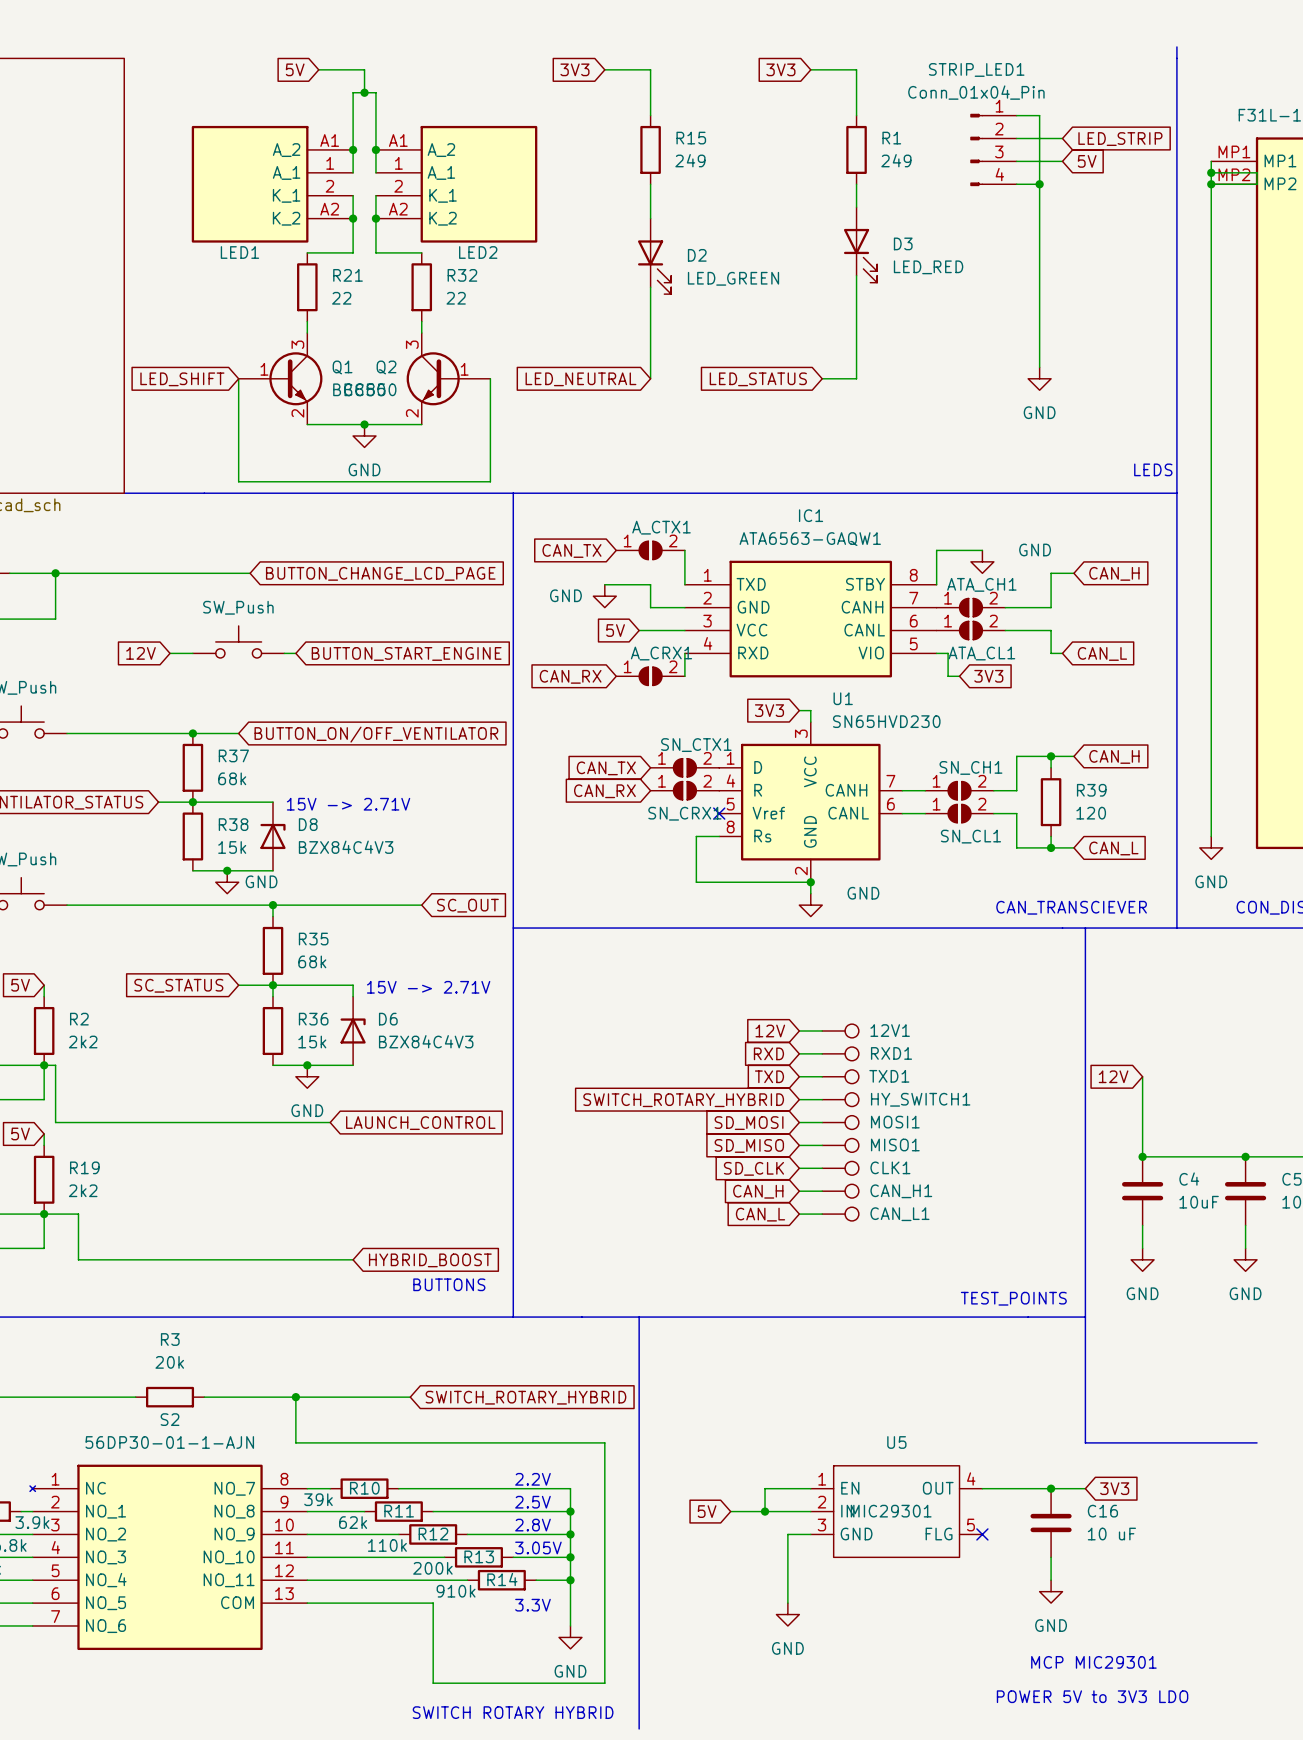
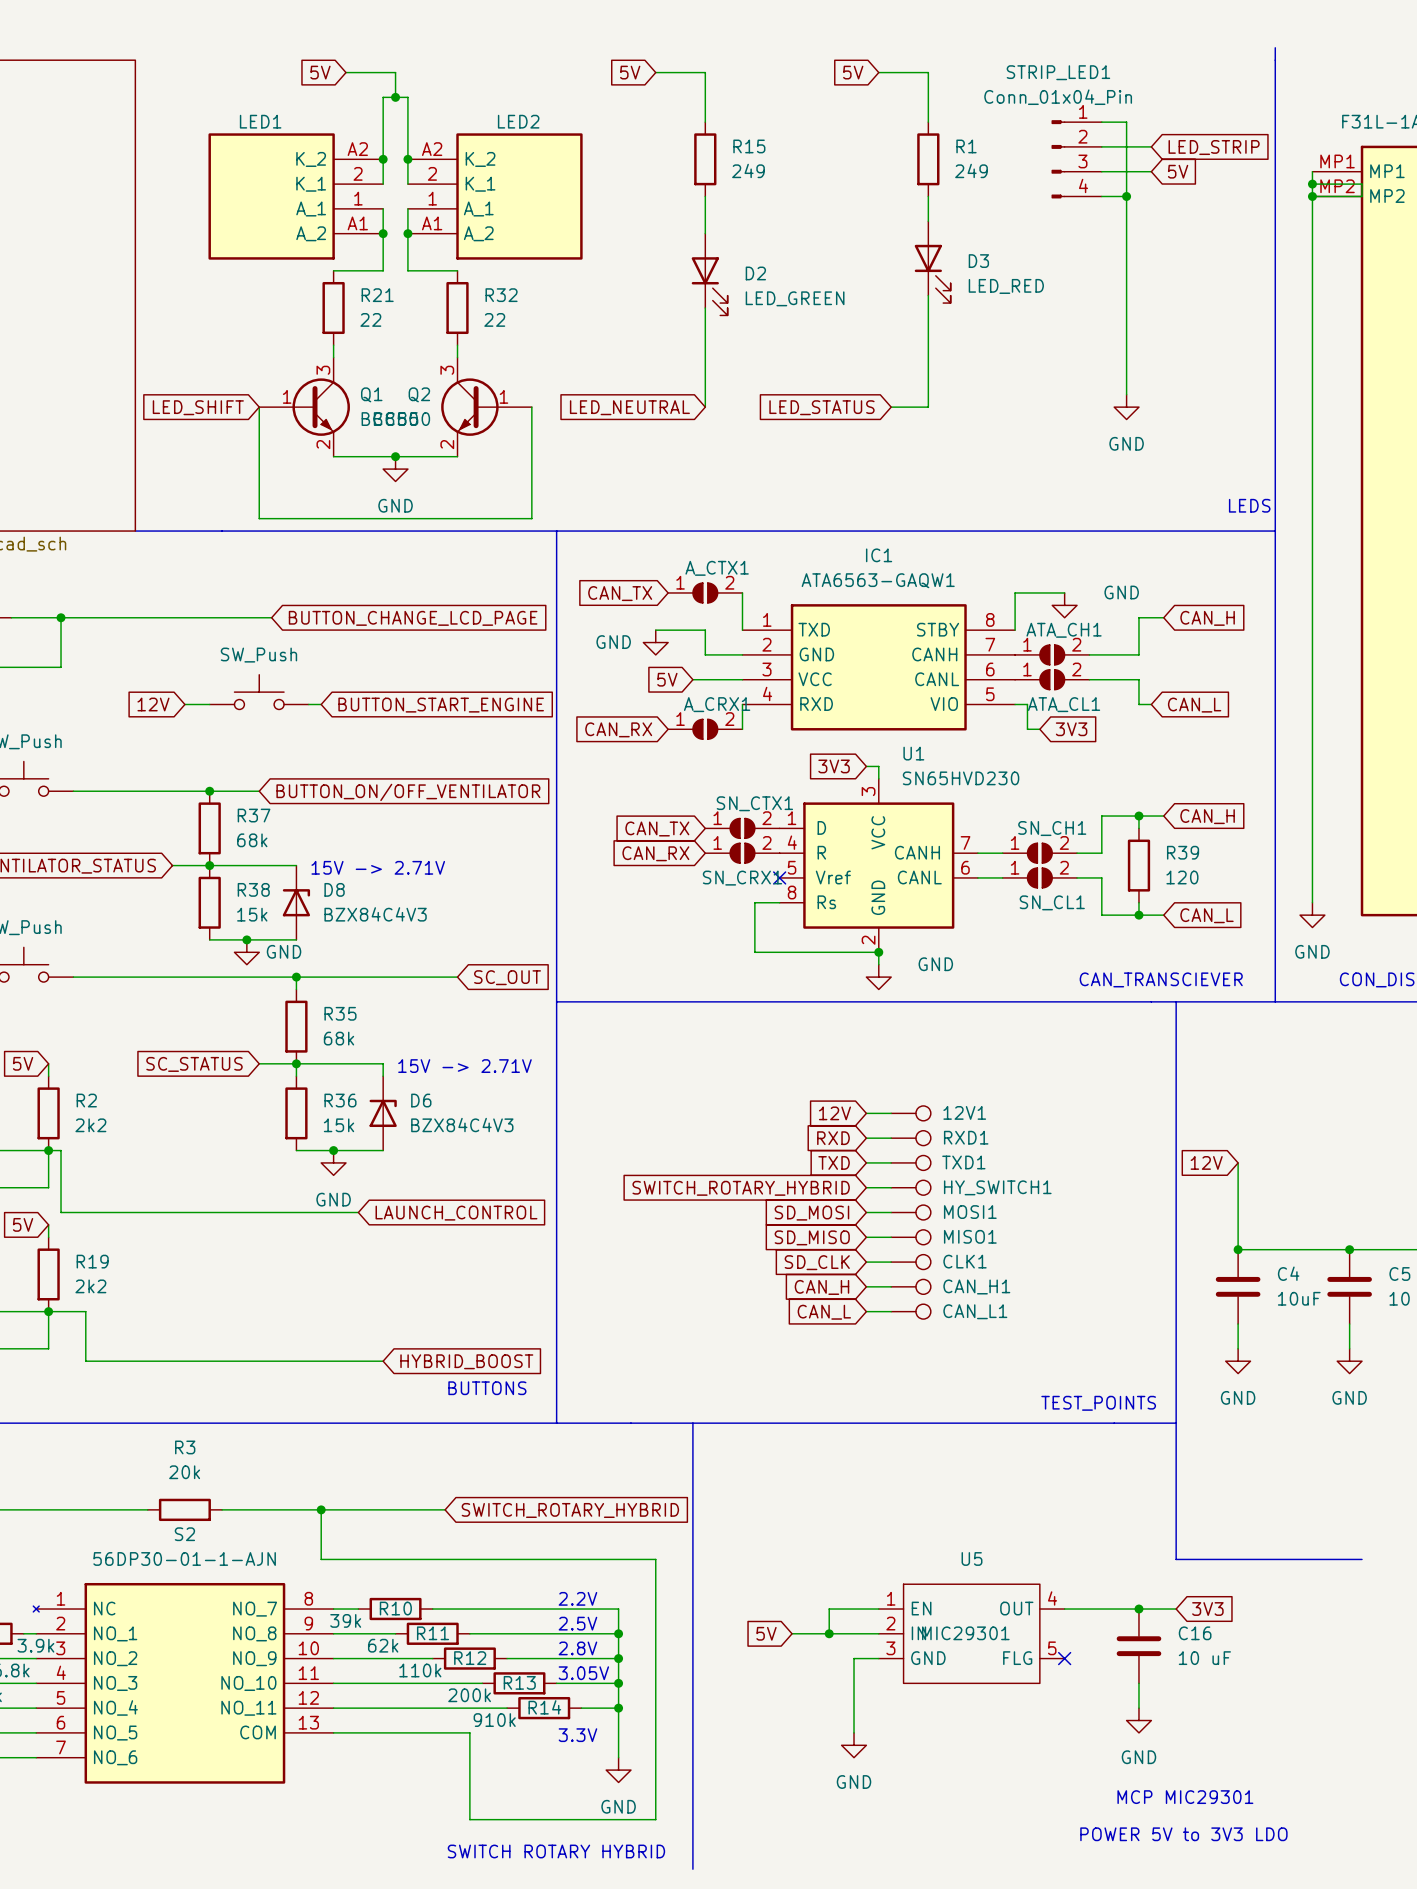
global label: 3V3 (574, 69) -> 5V (630, 72)
global label: 3V3 (780, 69) -> 5V (853, 72)
LED1 flip: as is (250, 184) -> up-down (271, 196)
LED2 flip: as is (478, 184) -> up-down (519, 196)

